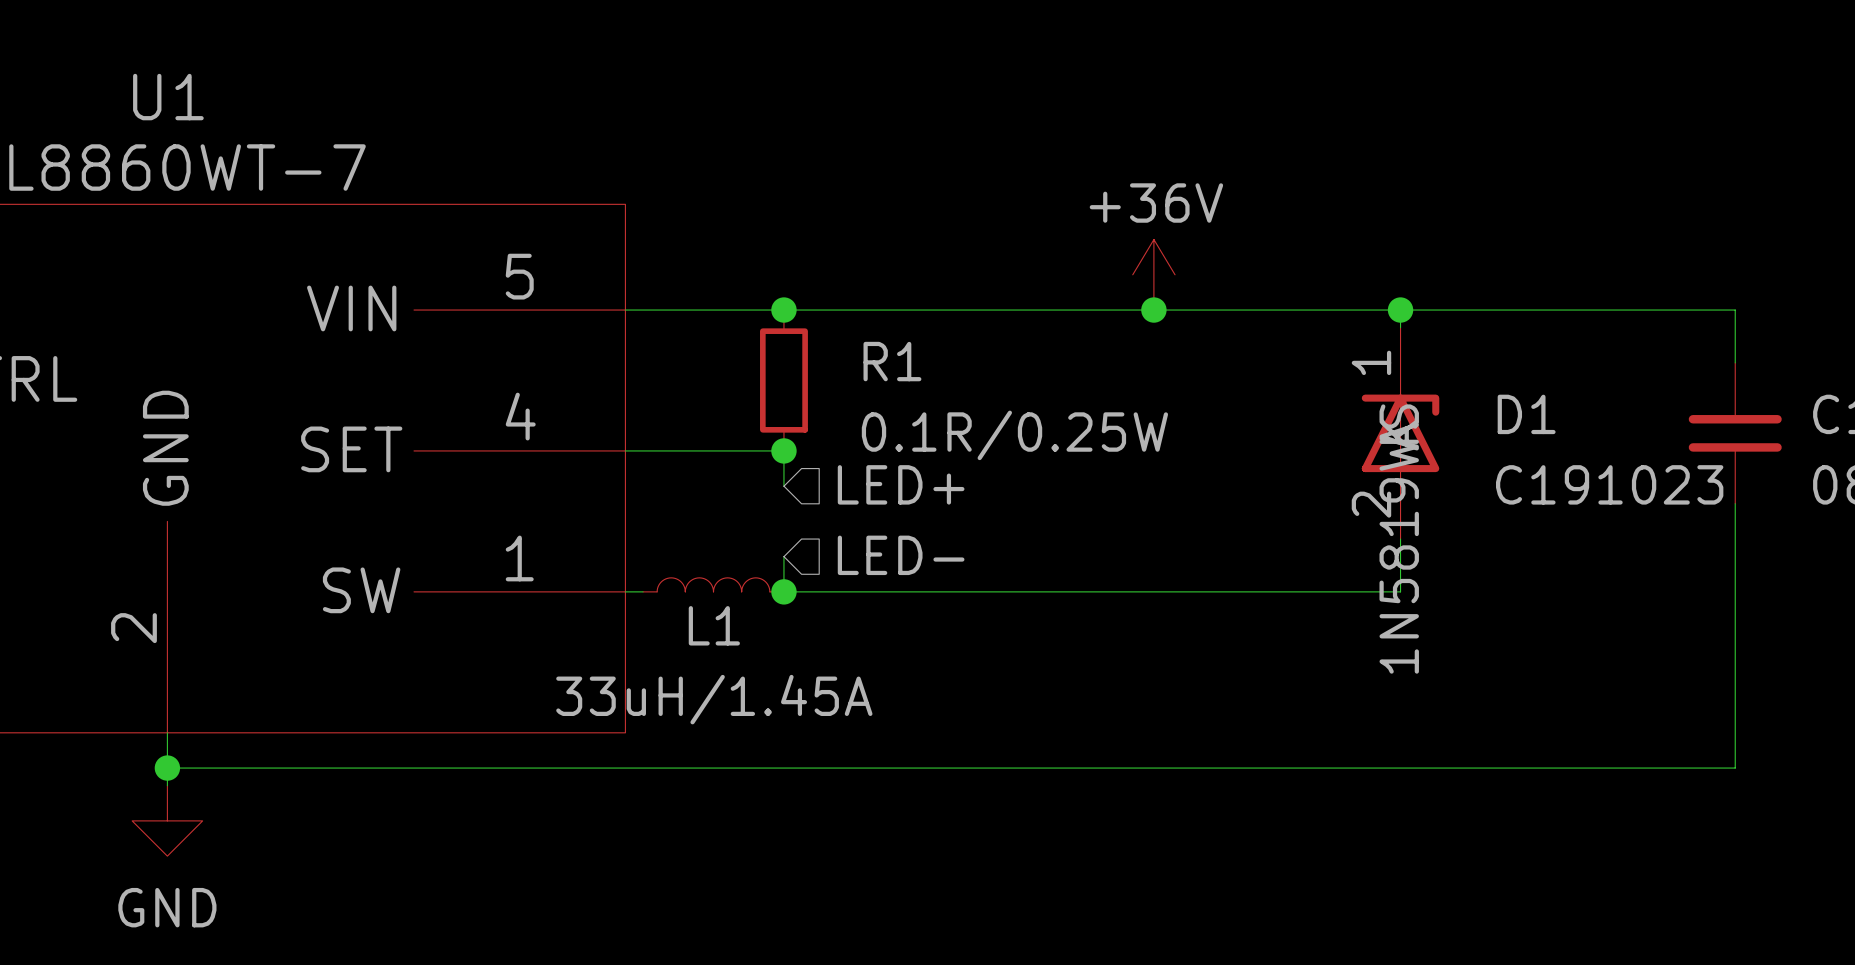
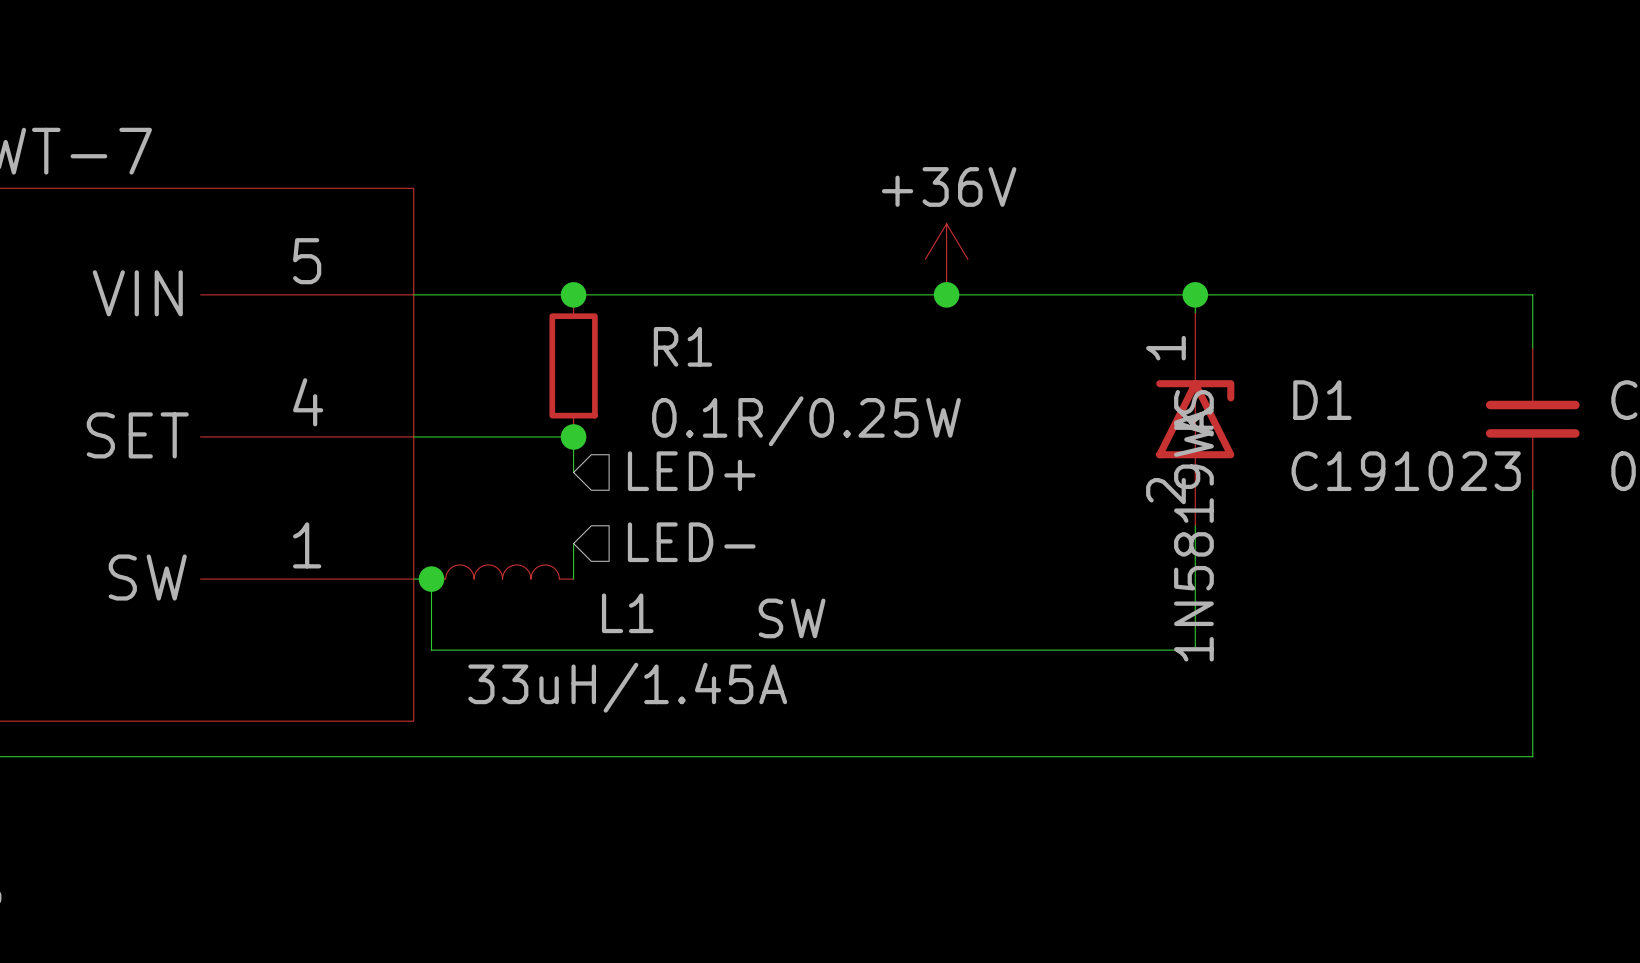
wire: (783, 591) (1400, 591) -> (431, 579) (431, 650) (1195, 650) (1195, 579)
junction position: (783, 591) -> (431, 579)
L1 name position: L1 (714, 625) -> L1 (627, 613)
label: none -> SW (792, 618)
L1 value position: 33uH/1.45A (714, 699) -> 33uH/1.45A (627, 687)

